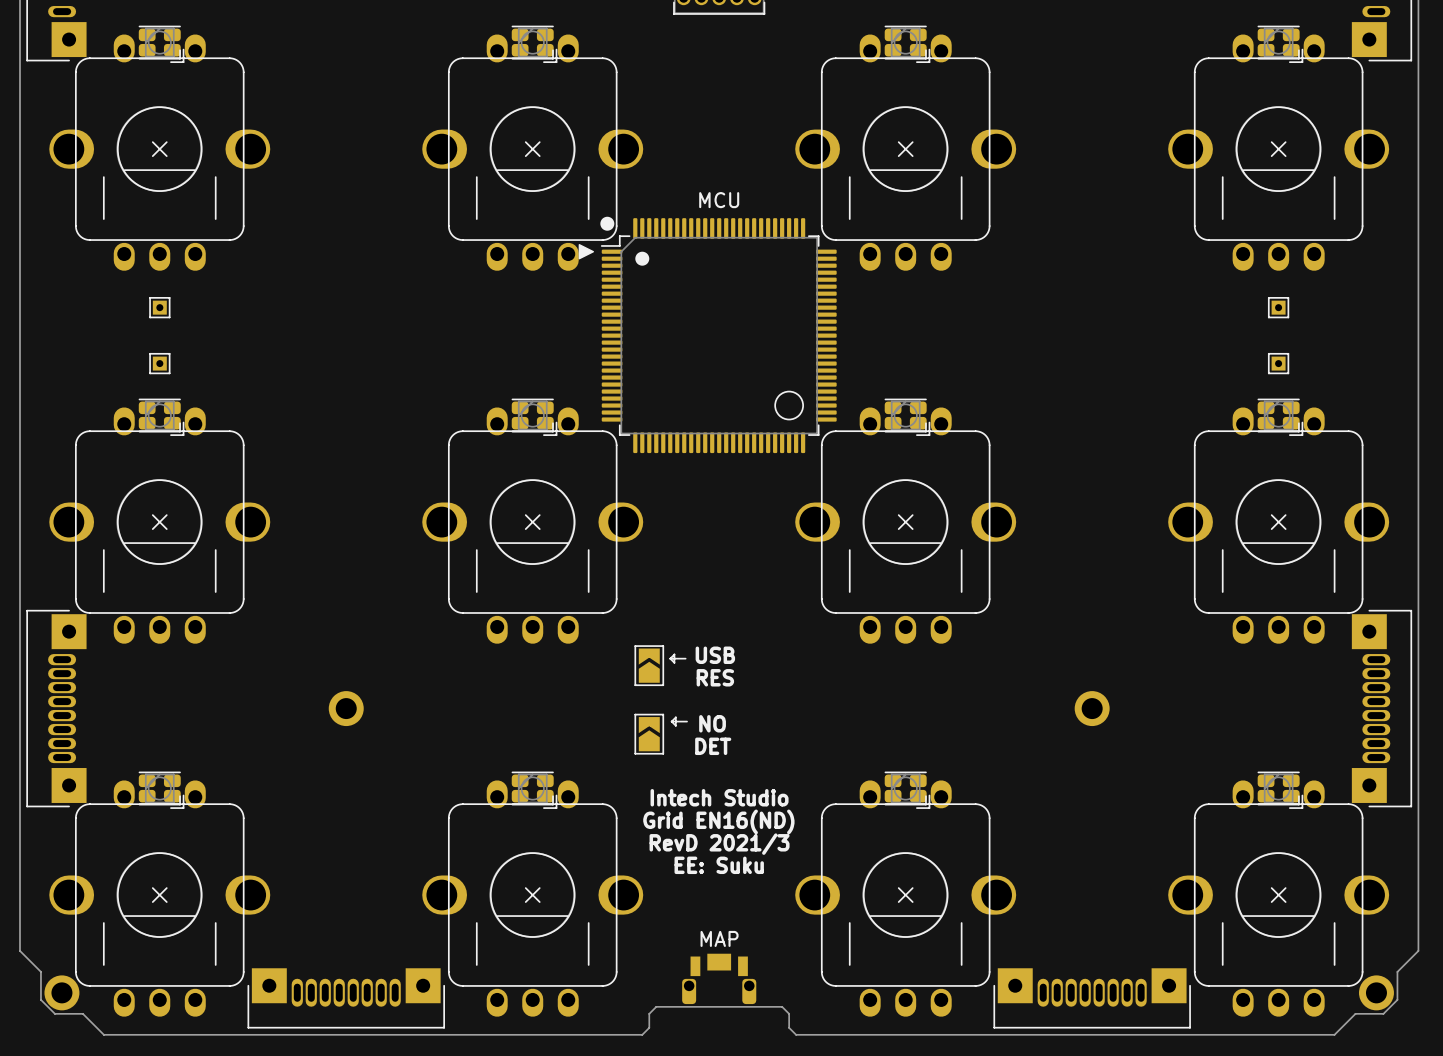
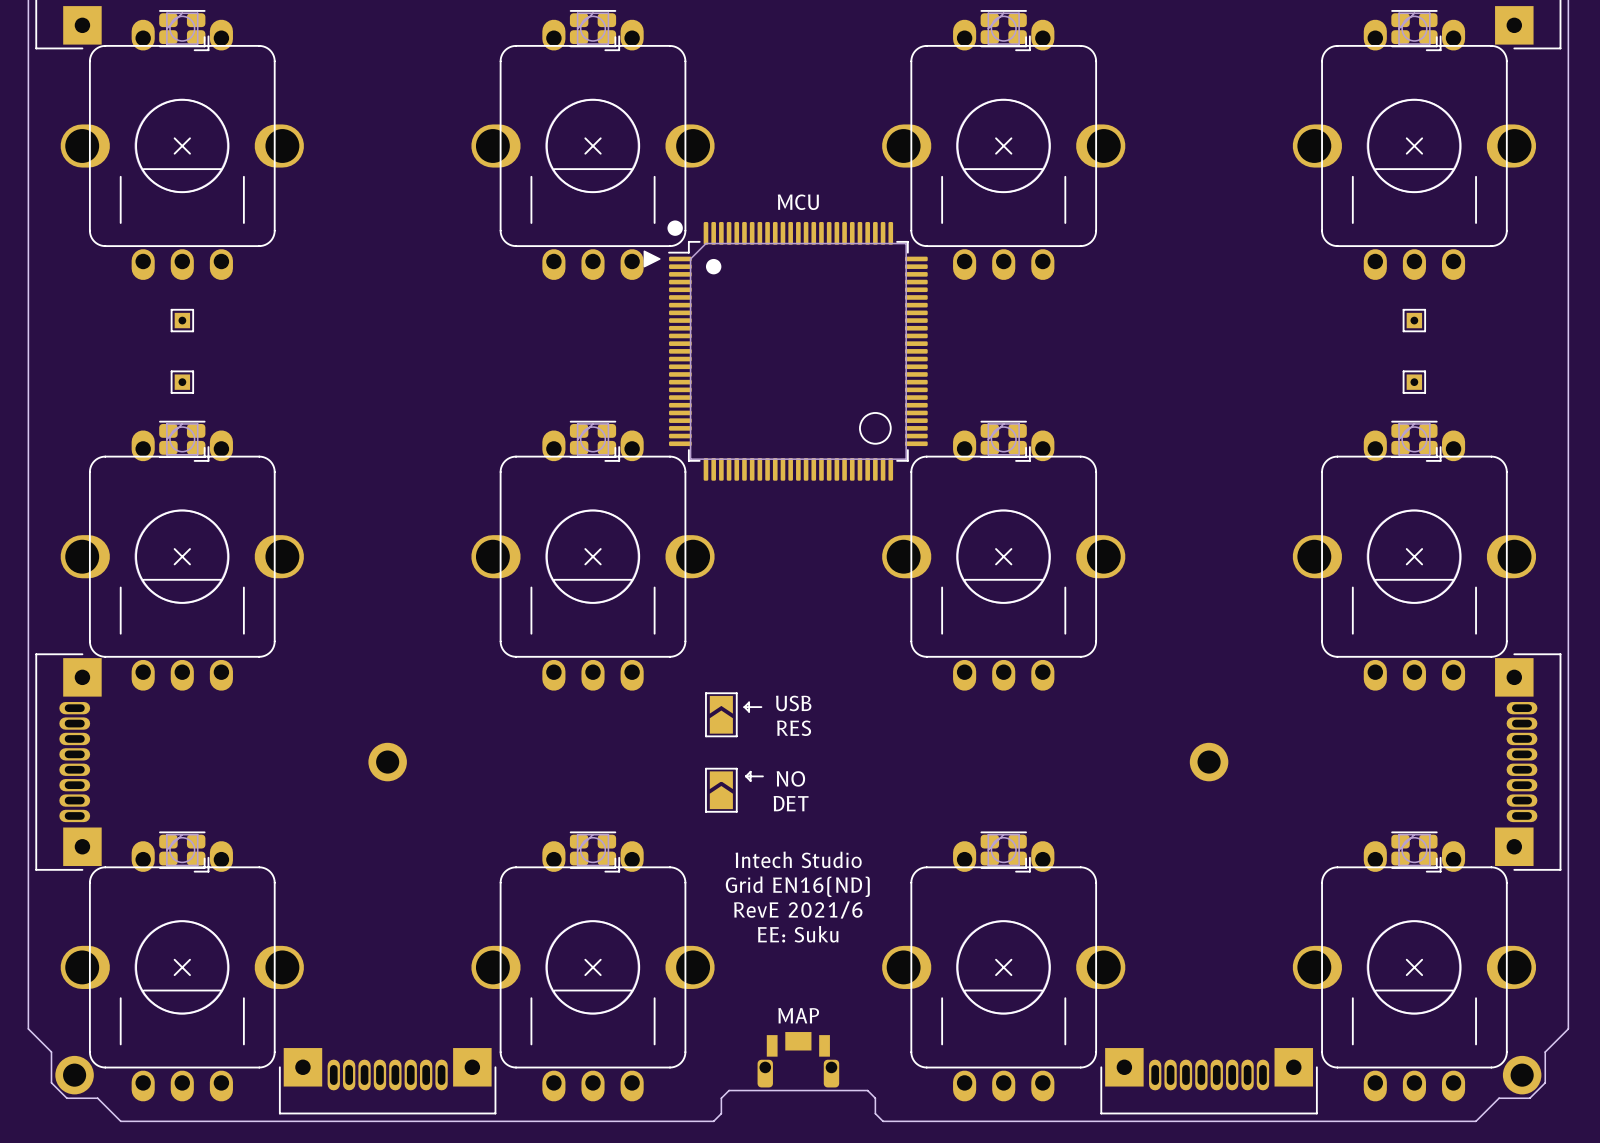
text: RevD 2021/3 (719, 844) -> RevE 2021/6 (798, 909)

